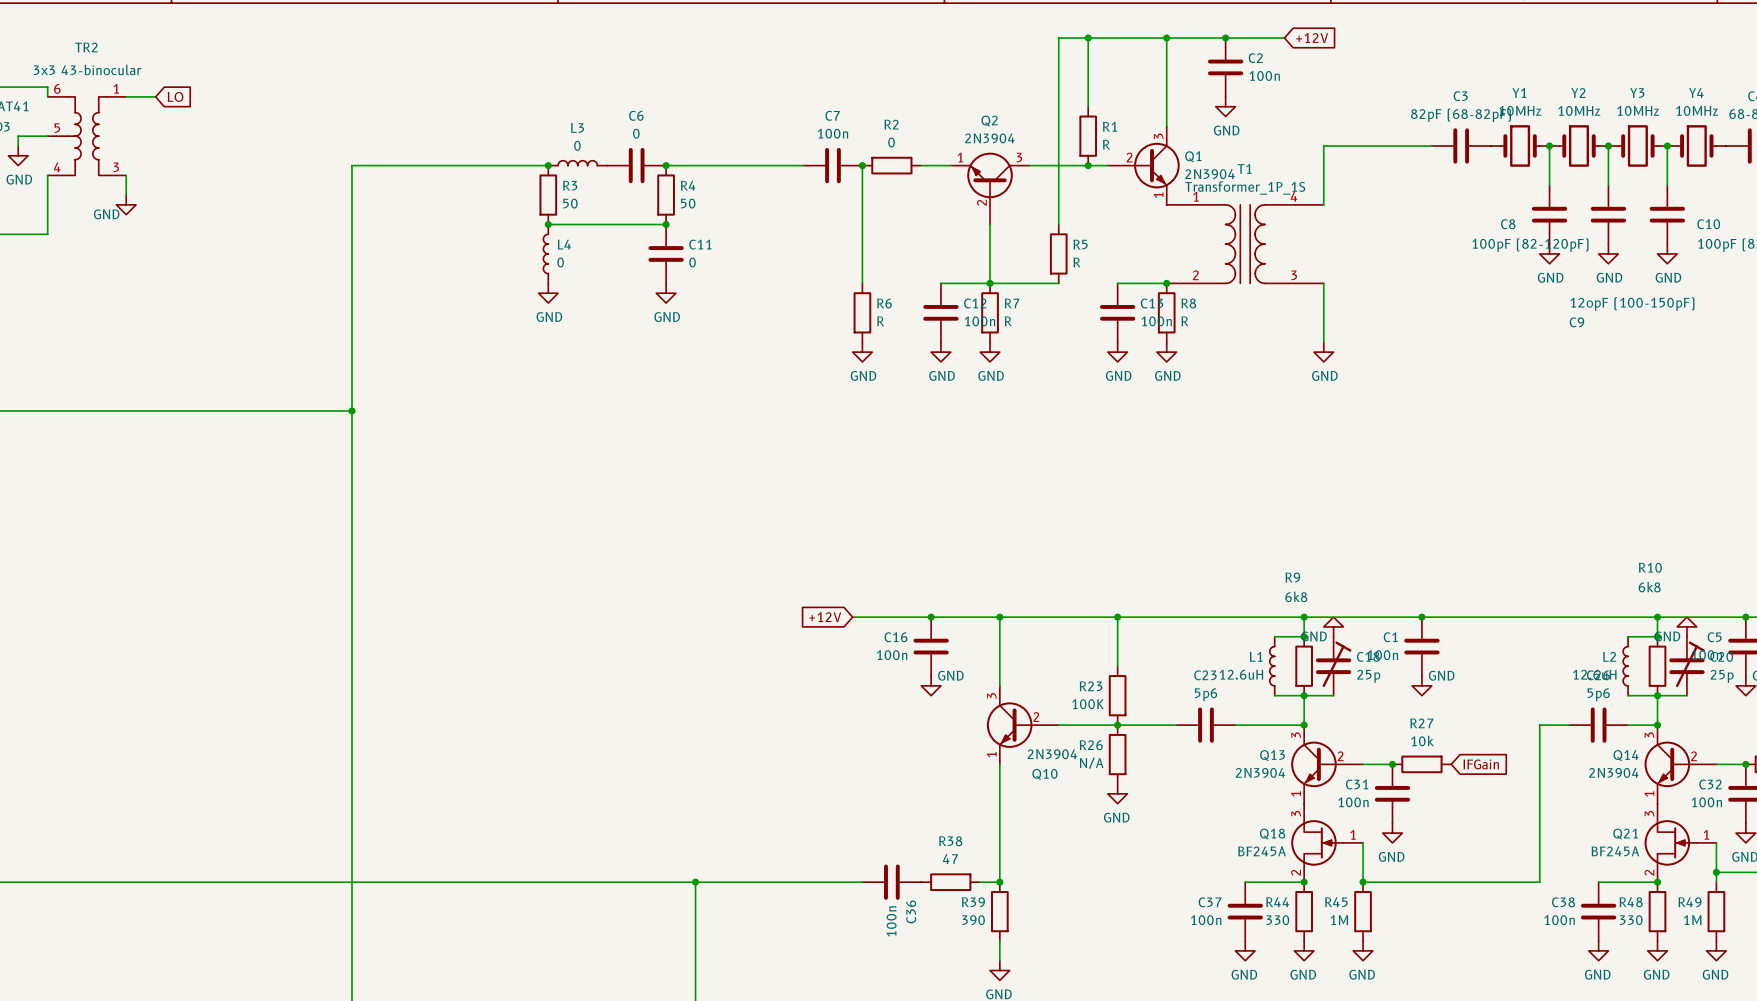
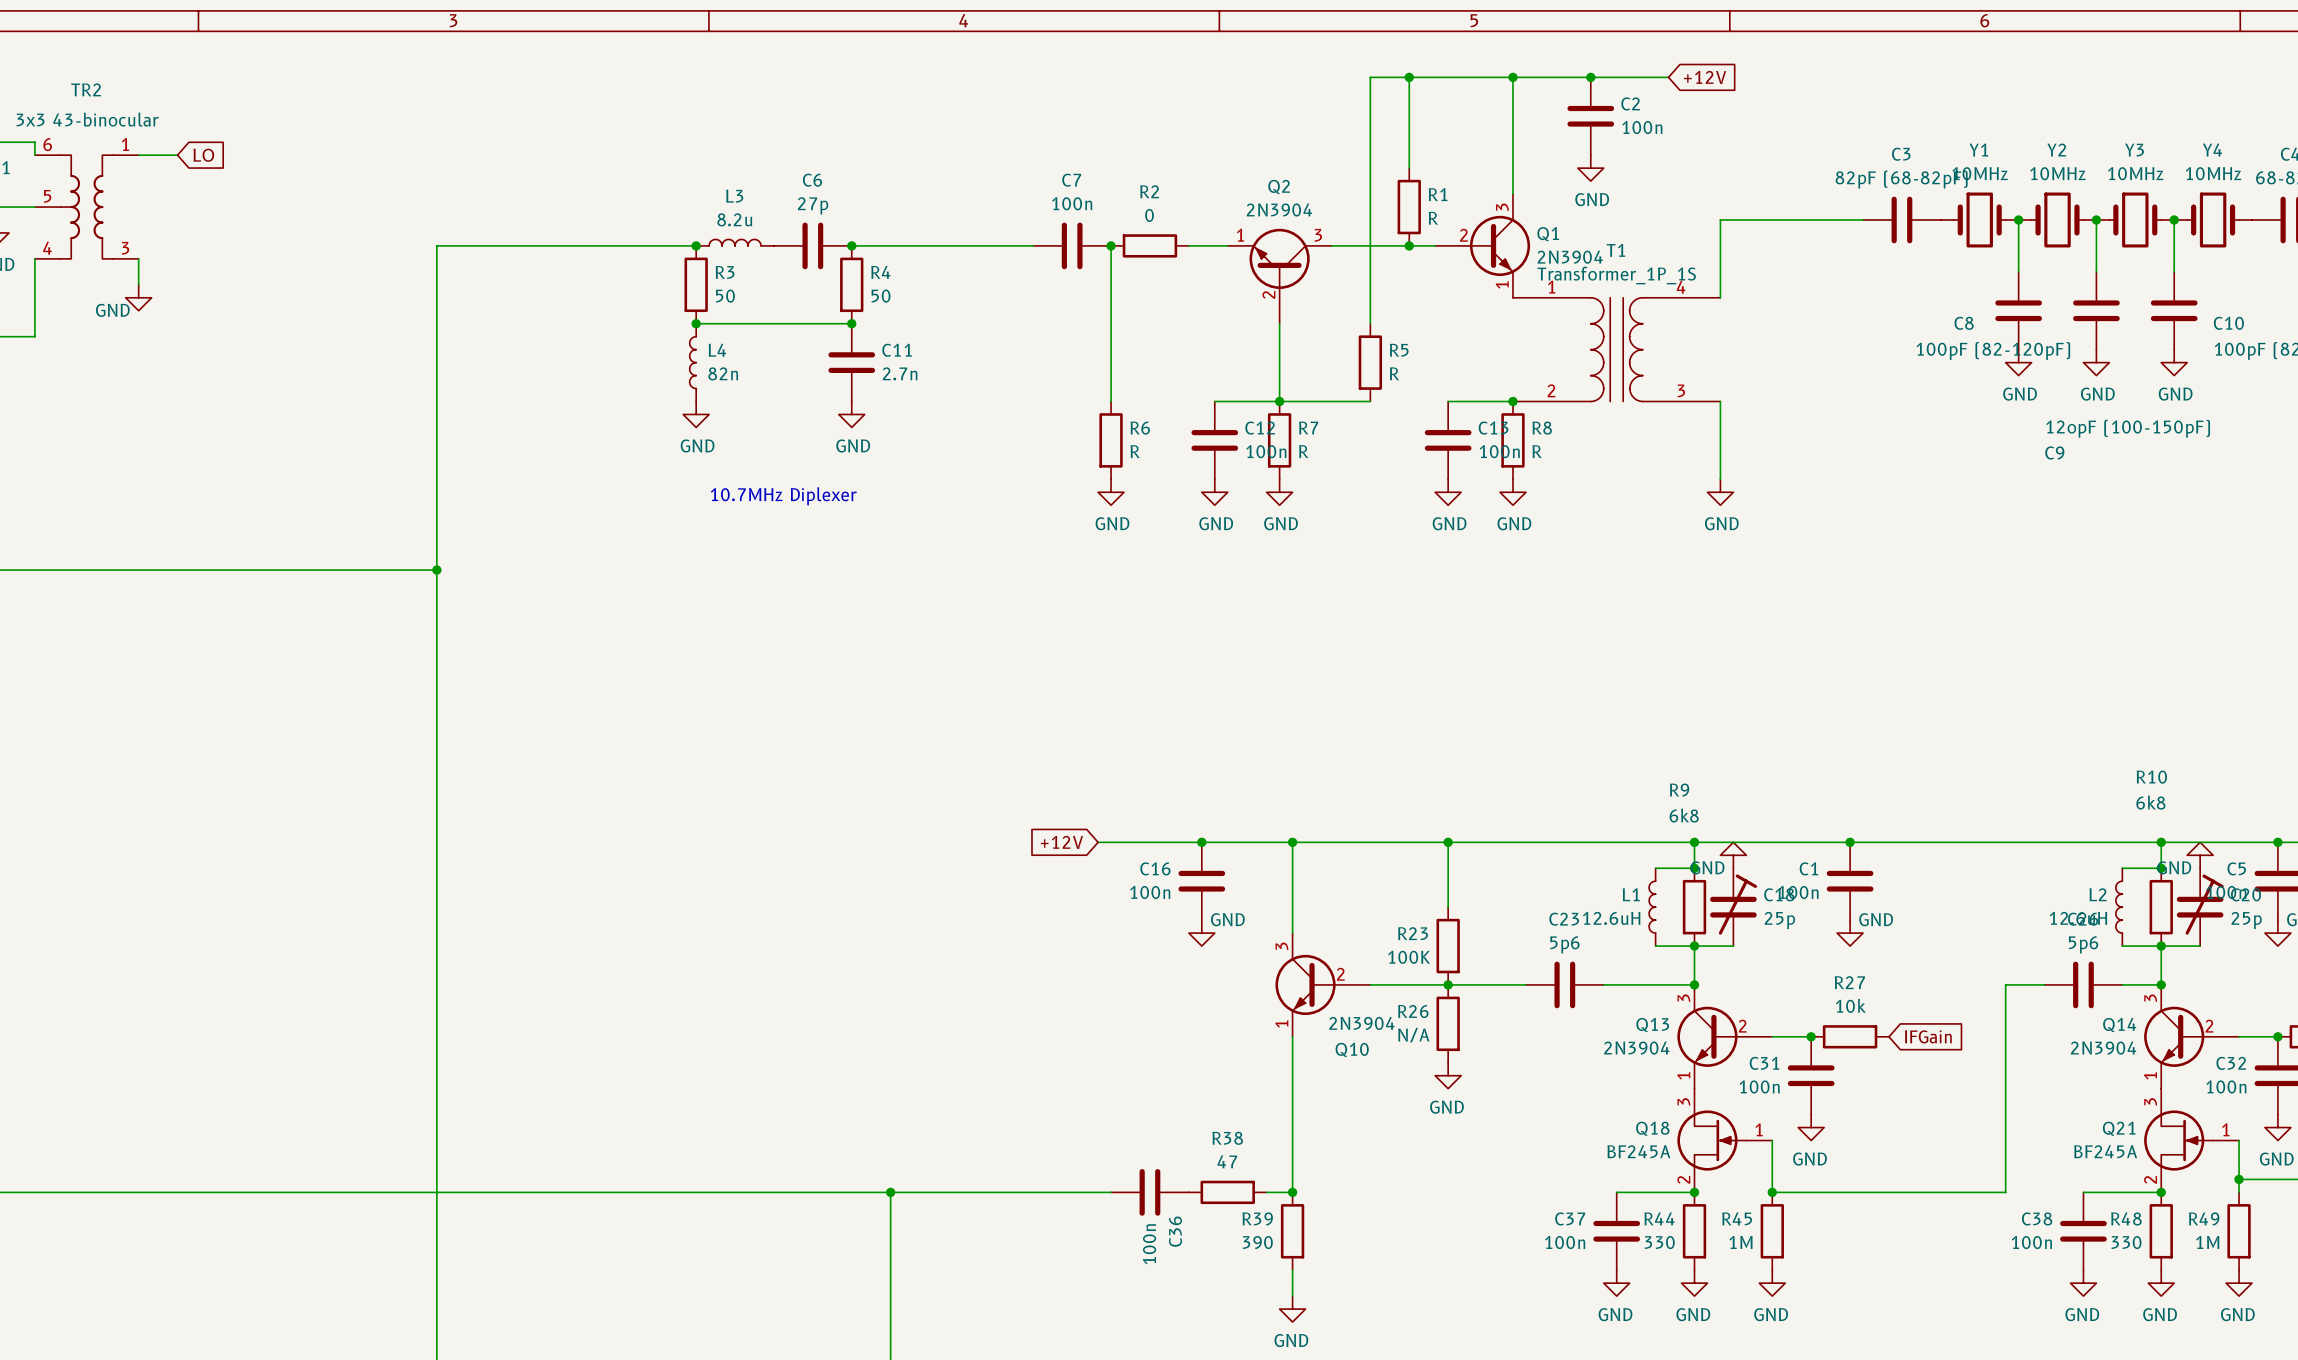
C6 value: 0 (636, 133) -> 27p (813, 205)
L3 value: 0 (577, 145) -> 8.2u (734, 219)
L4 value: 0 (560, 262) -> 82n (723, 373)
C11 value: 0 (692, 262) -> 2.7n (900, 373)
text: none -> 10.7MHz Diplexer (783, 496)

